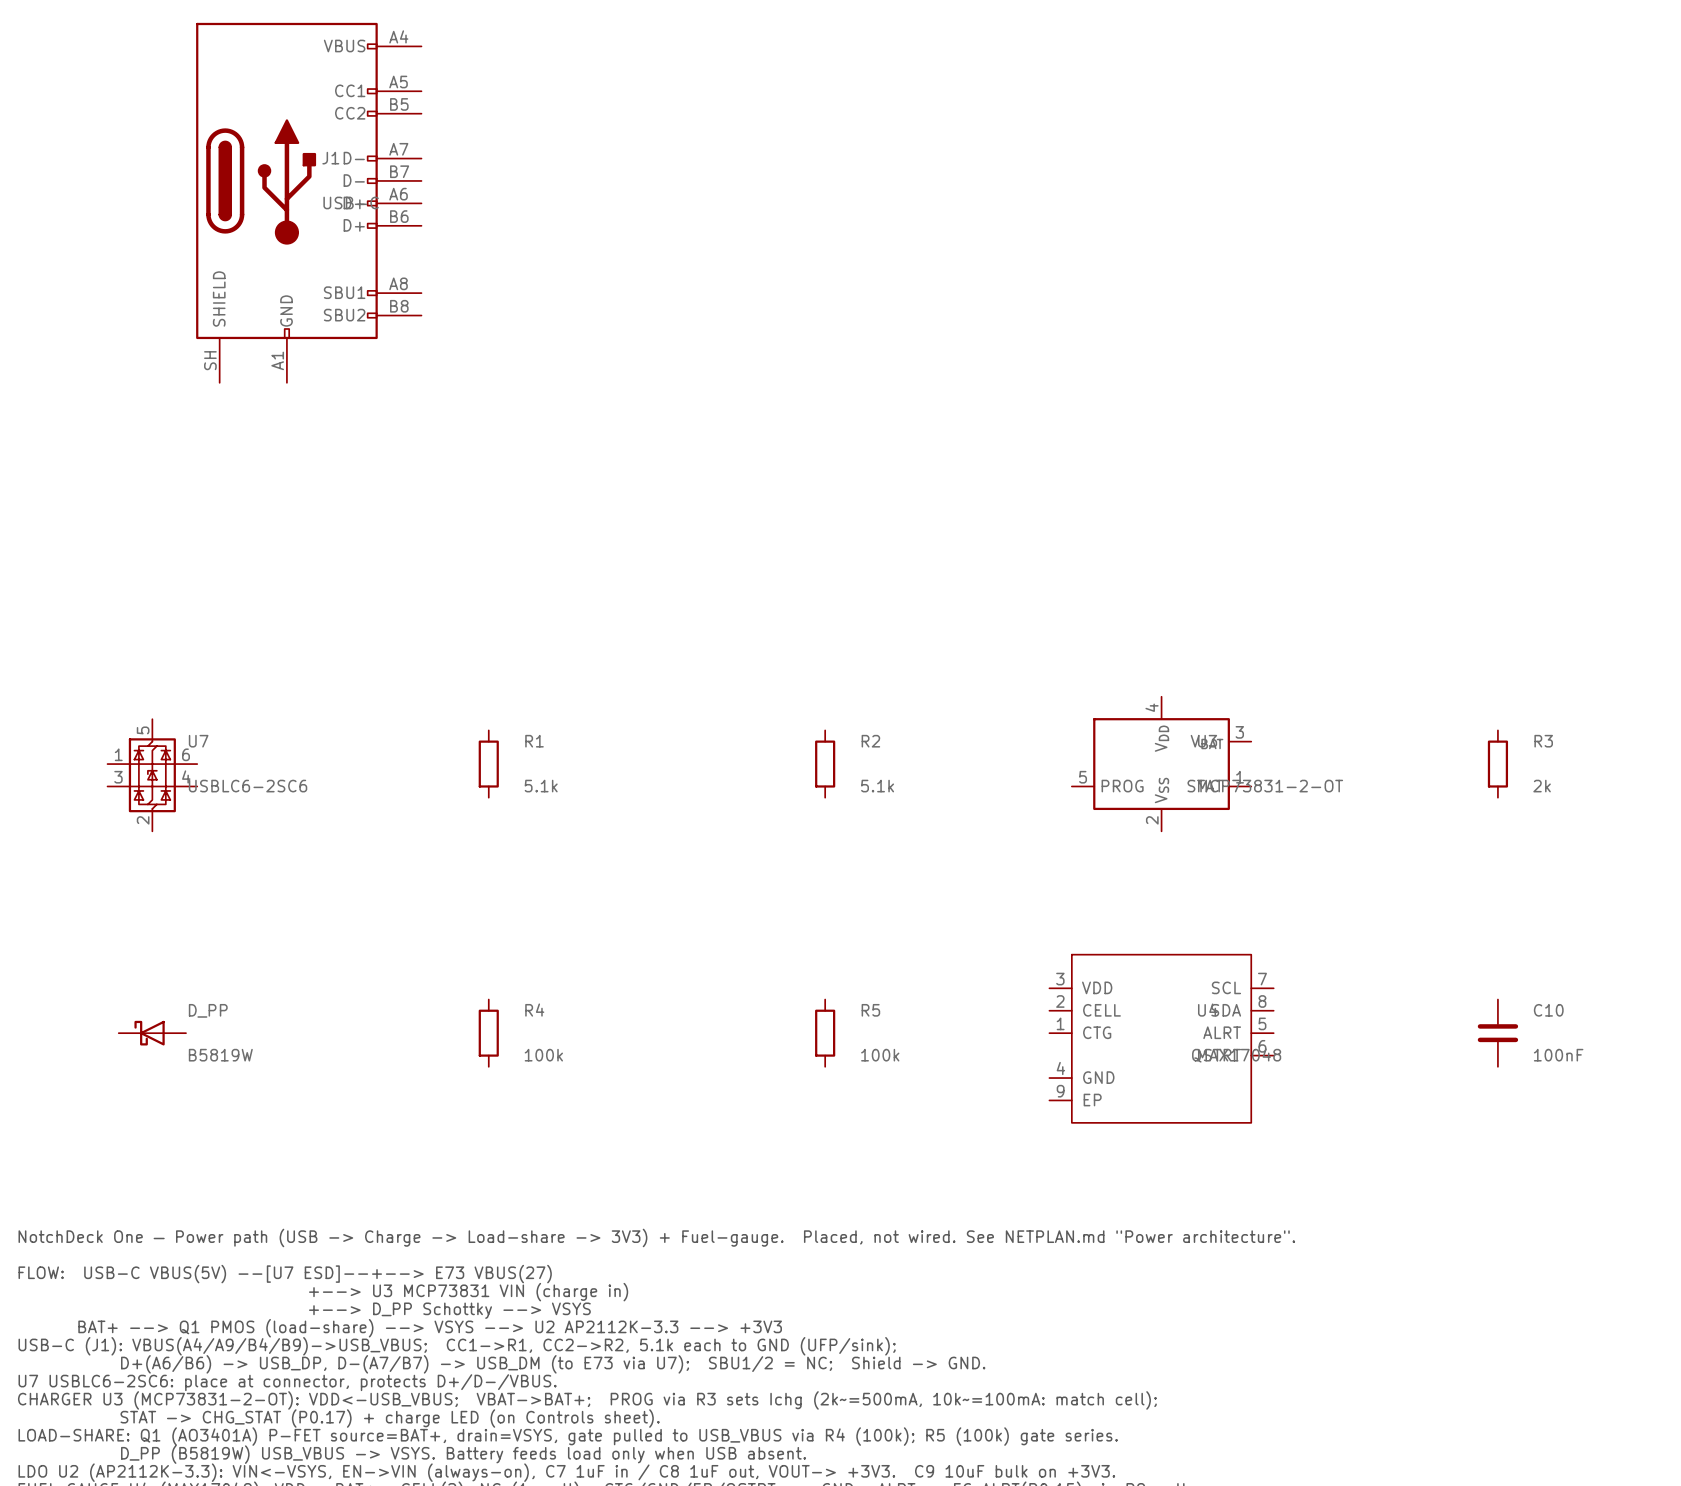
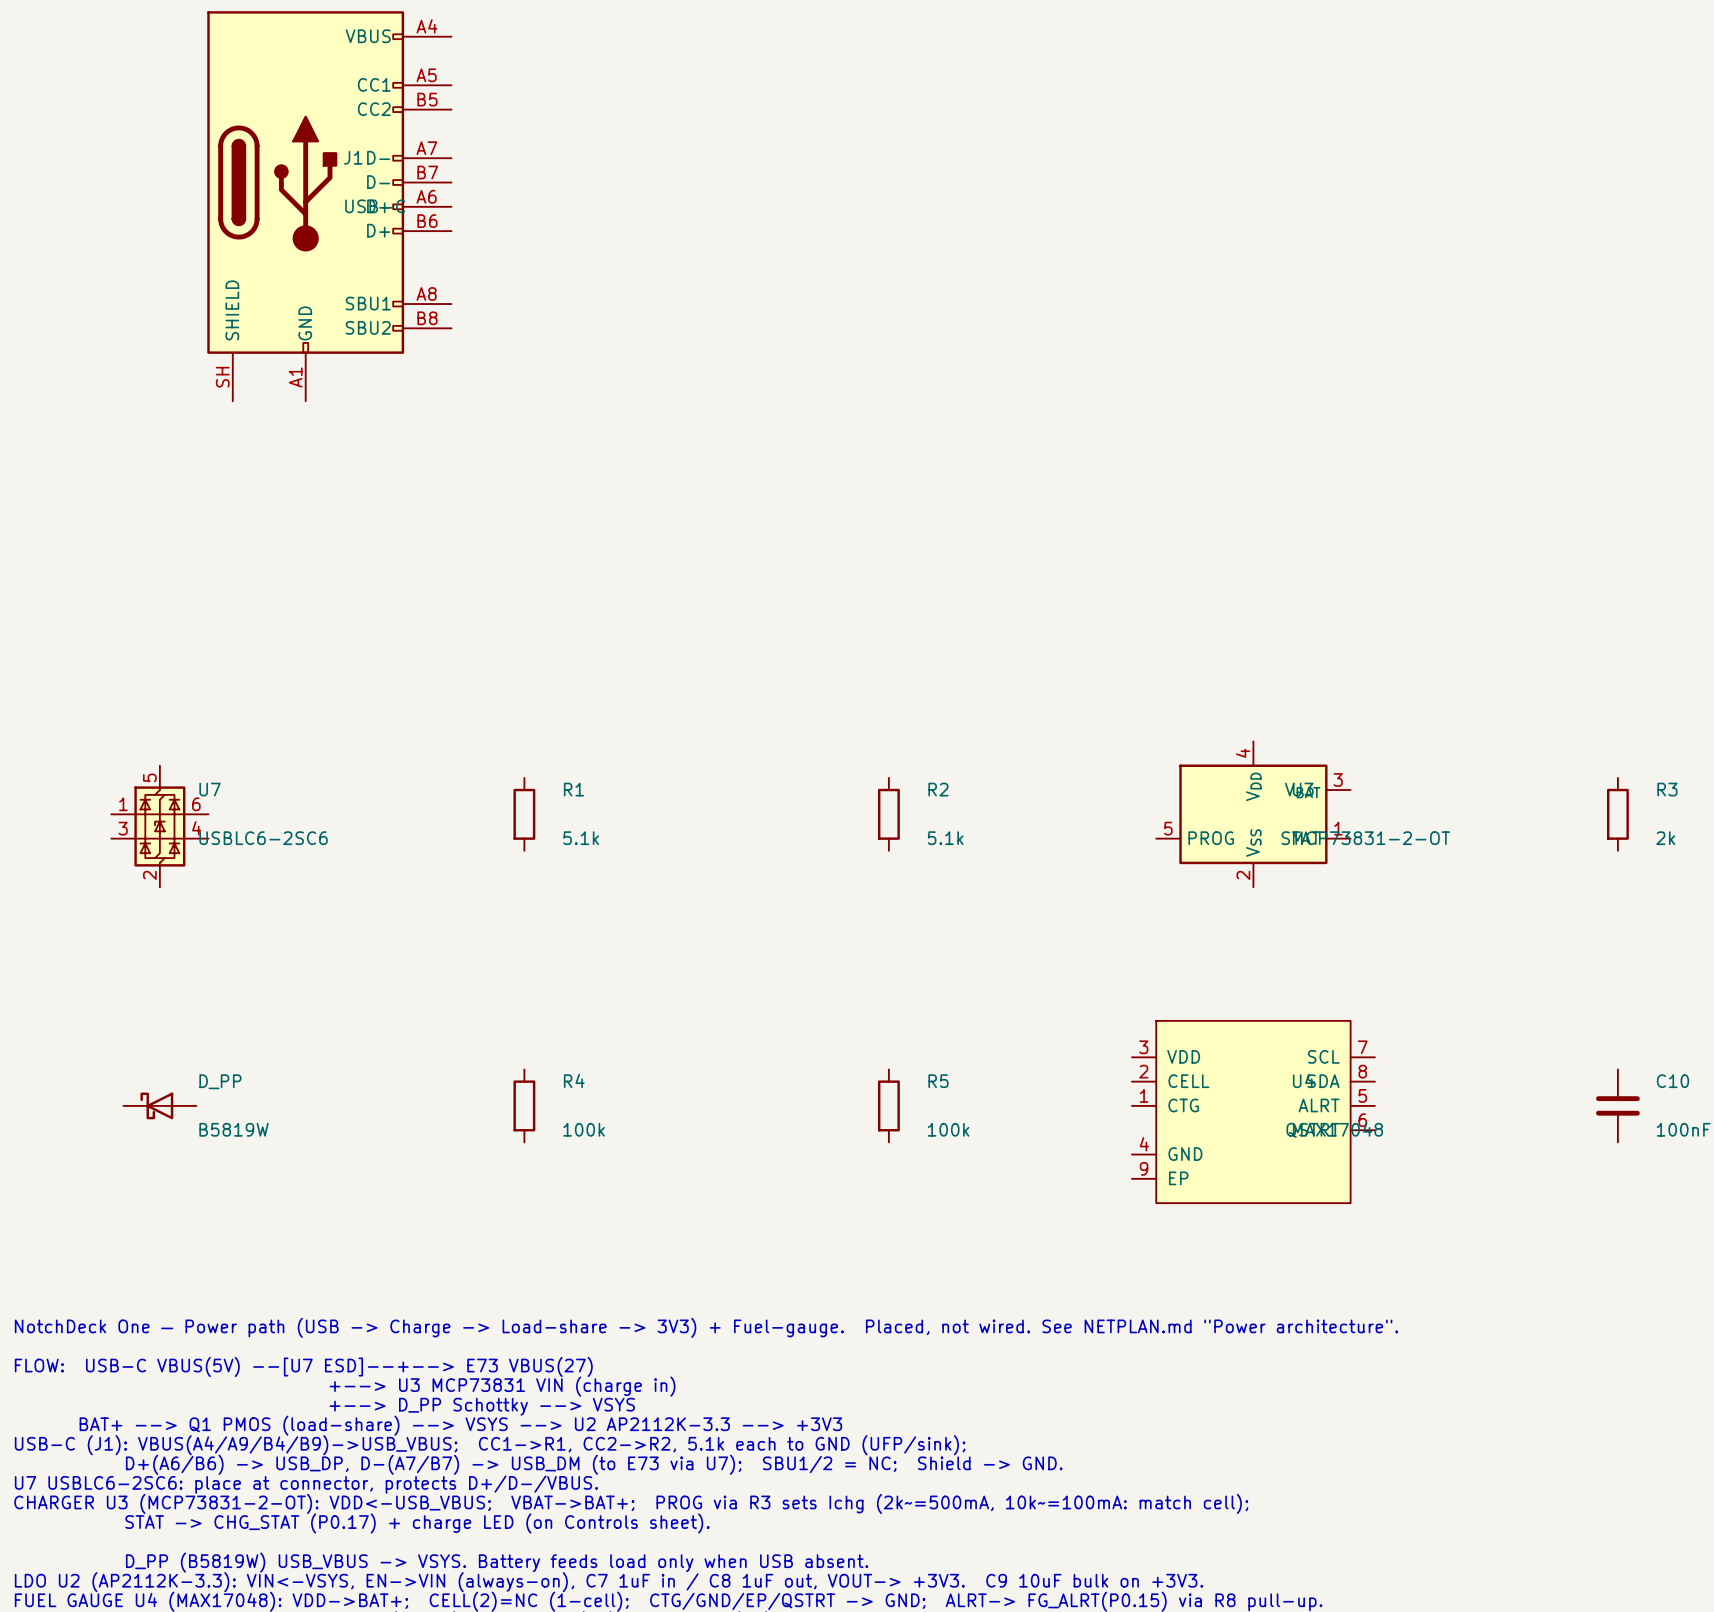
text: LOAD-SHARE: Q1 (AO3401A) P-FET source=BAT+, drain=VSYS, gate pulled to USB_VBUS via R4 (100k); R5 (100k) gate series. (568, 1436) -> none

